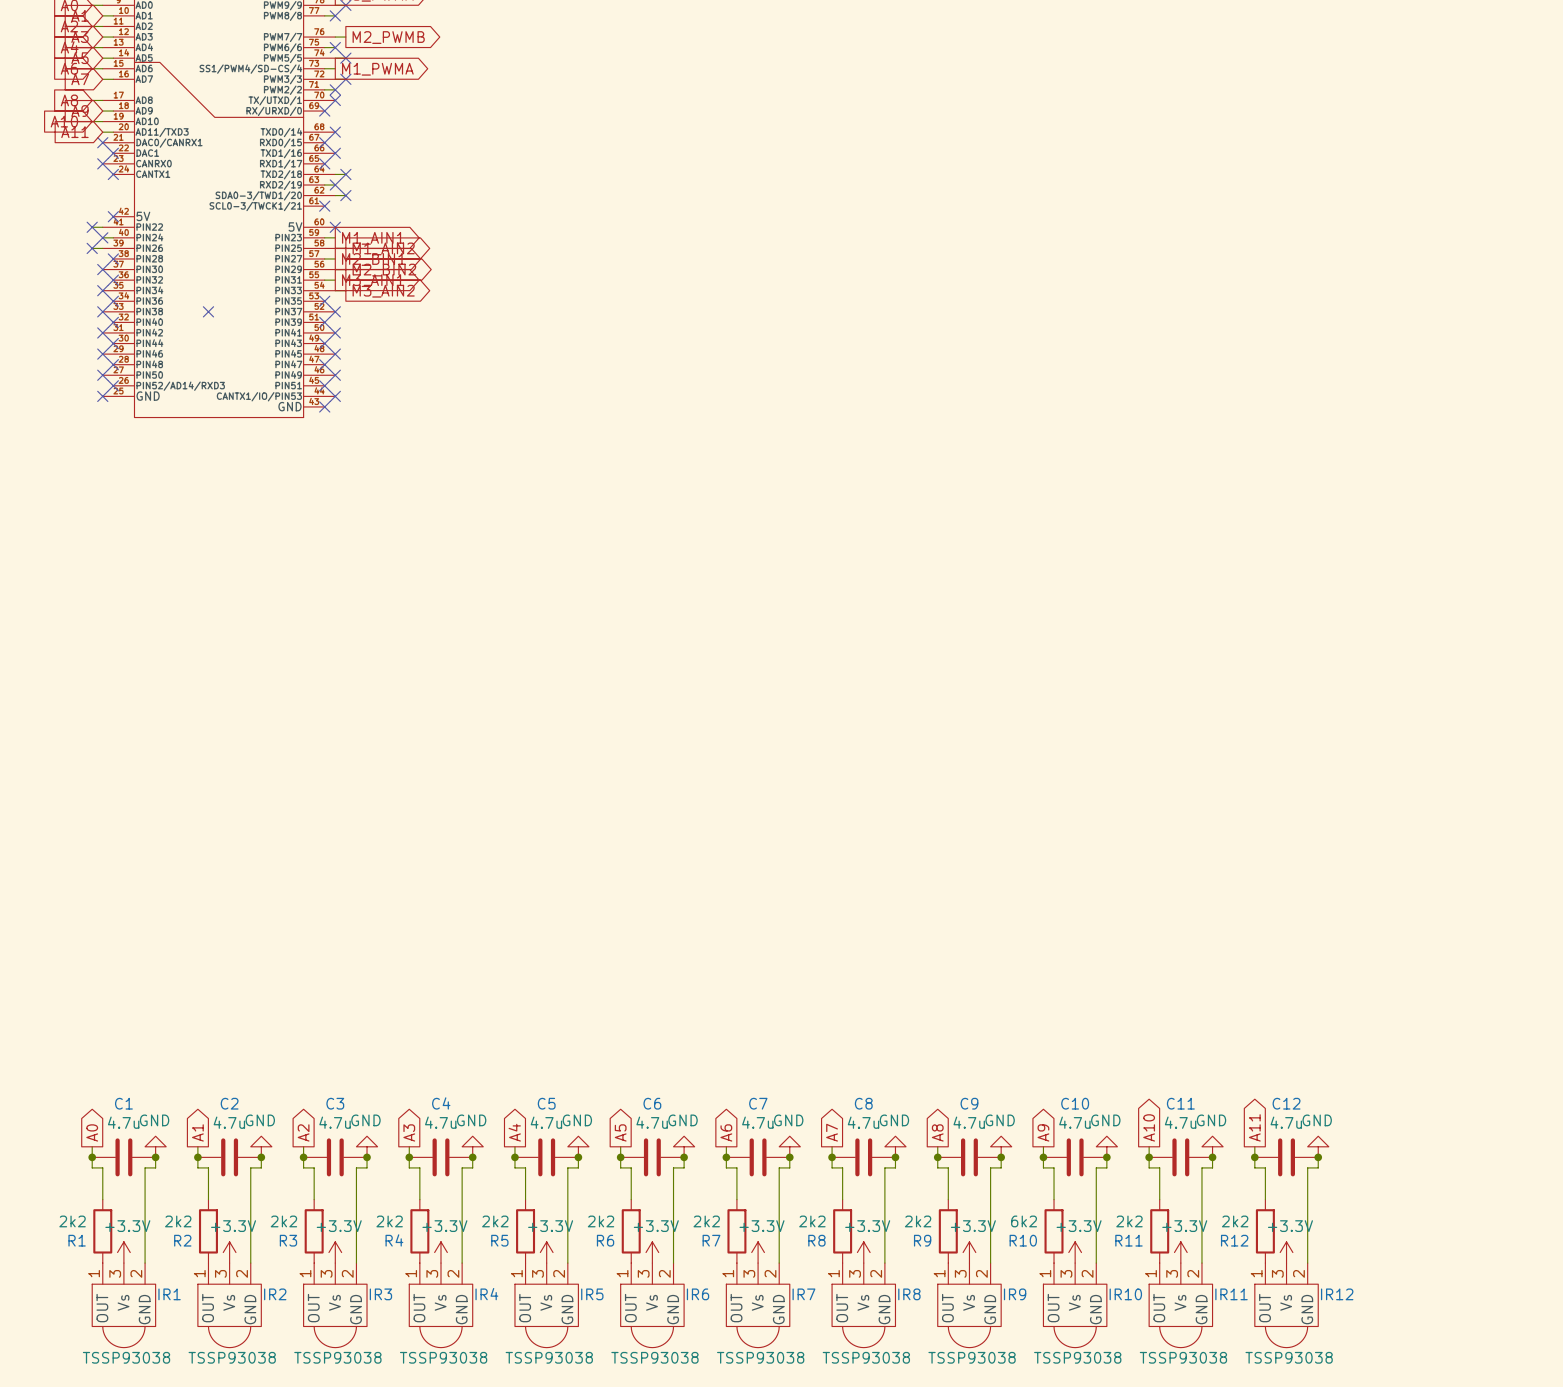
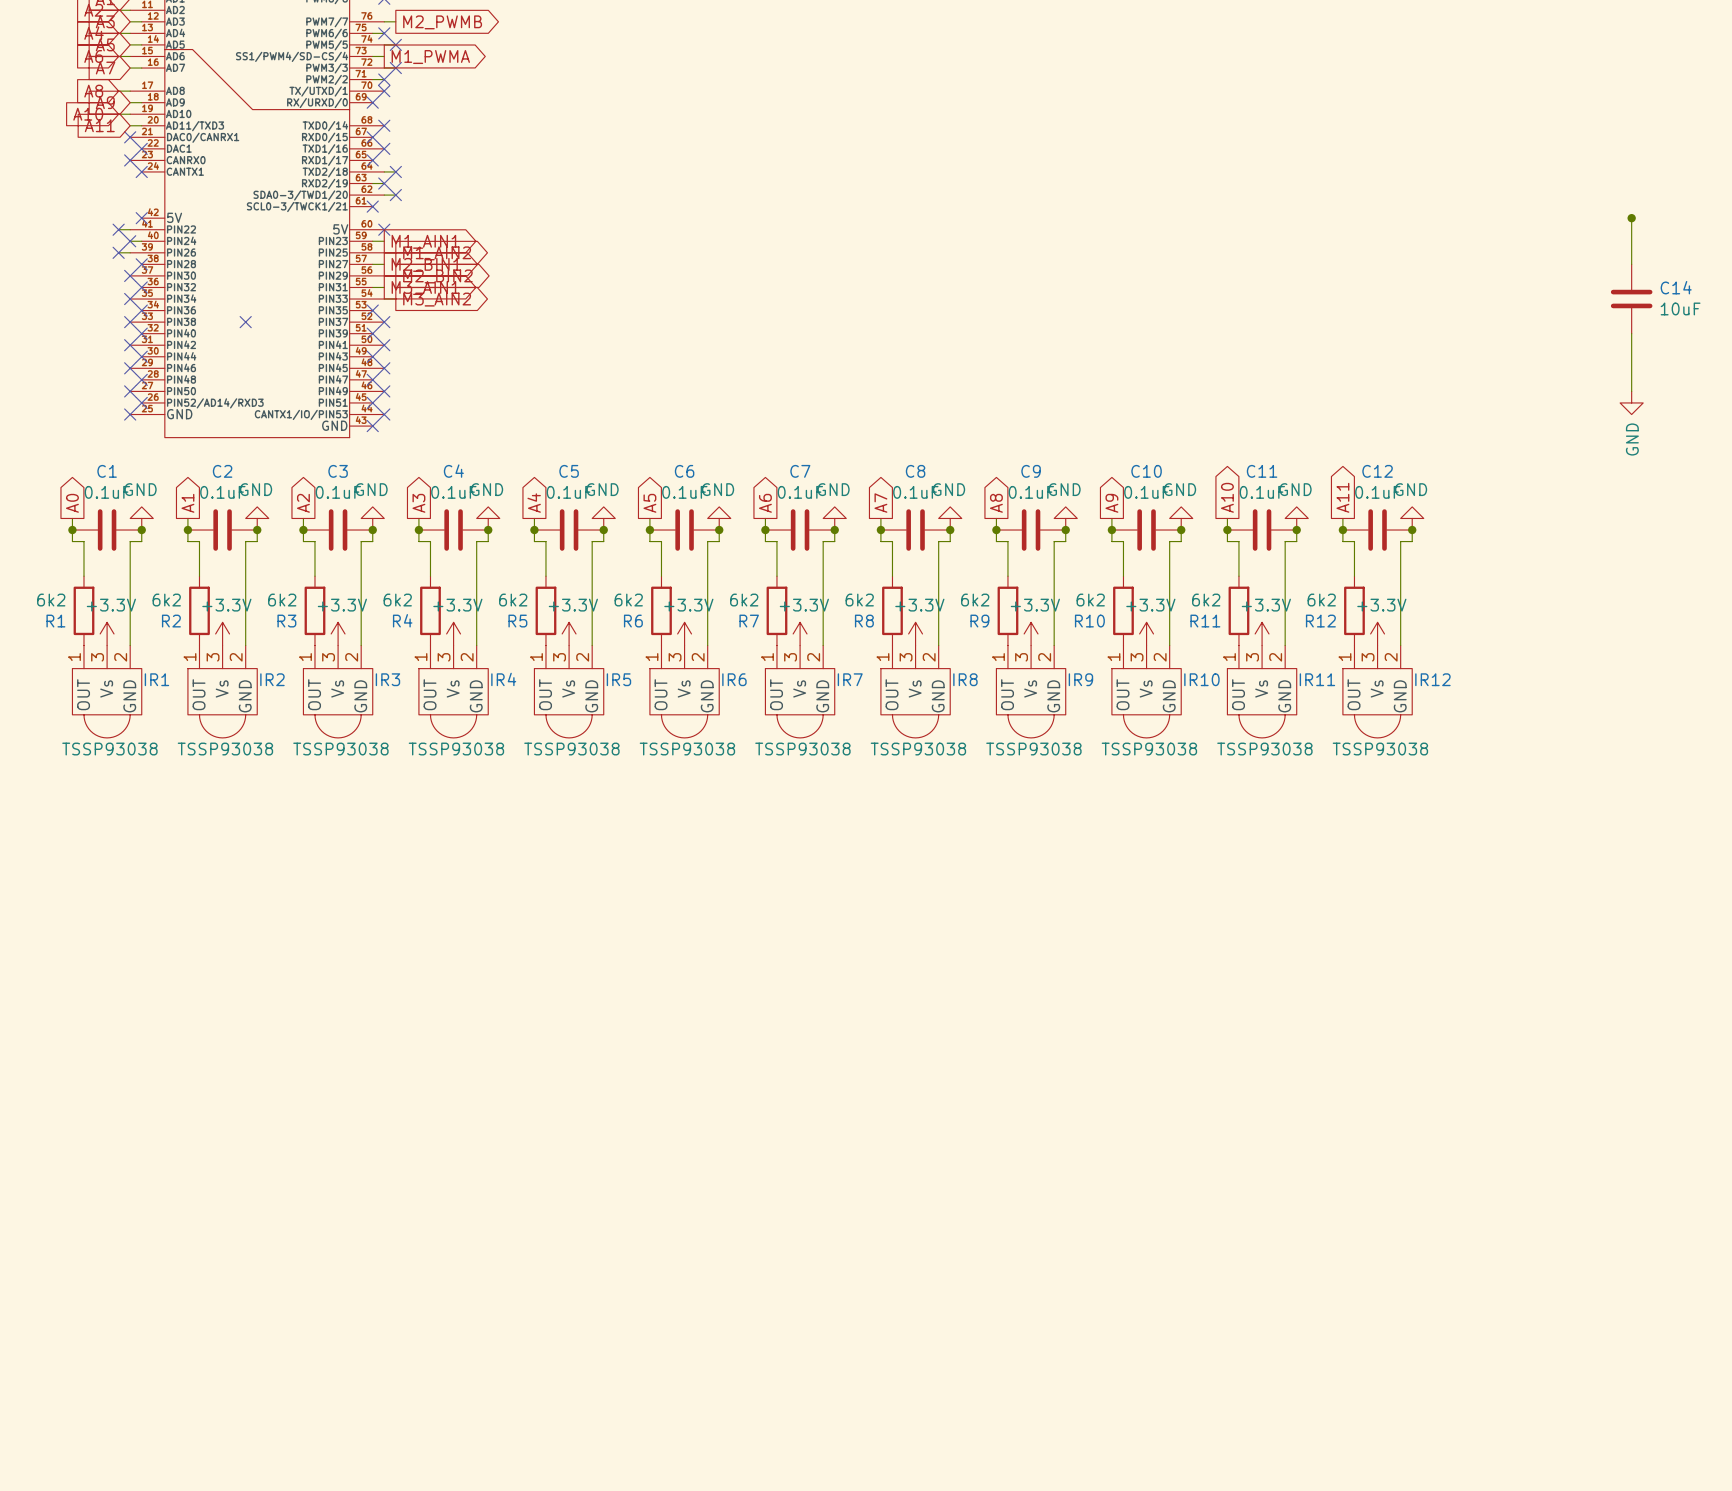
wire: none -> (1631, 218) (1631, 264)
junction: none -> (1631, 218)
C14: none -> 10uF (1631, 299)
wire: none -> (1631, 333) (1631, 391)
power symbol: none -> GND (1631, 402)
global label: none -> A10 (1227, 497)
global label: none -> A11 (1342, 497)
global label: none -> A0 (72, 503)
global label: none -> A1 (187, 503)
global label: none -> A2 (303, 503)
global label: none -> A3 (418, 503)
global label: none -> A4 (534, 503)
global label: none -> A5 (649, 503)
global label: none -> A6 (765, 503)
global label: none -> A7 (880, 503)
global label: none -> A8 (996, 503)
global label: none -> A9 (1111, 503)
wire: none -> (72, 518) (72, 541) (83, 541) (83, 576)
power symbol: none -> GND (141, 518)
wire: none -> (187, 518) (187, 541) (199, 541) (199, 576)
power symbol: none -> GND (257, 518)
wire: none -> (303, 518) (303, 541) (314, 541) (314, 576)
power symbol: none -> GND (372, 518)
wire: none -> (418, 518) (418, 541) (430, 541) (430, 576)
power symbol: none -> GND (488, 518)
wire: none -> (534, 518) (534, 541) (545, 541) (545, 576)
power symbol: none -> GND (603, 518)
wire: none -> (649, 518) (649, 541) (661, 541) (661, 576)
power symbol: none -> GND (719, 518)
wire: none -> (765, 518) (765, 541) (776, 541) (776, 576)
power symbol: none -> GND (834, 518)
wire: none -> (880, 518) (880, 541) (892, 541) (892, 576)
power symbol: none -> GND (950, 518)
wire: none -> (996, 518) (996, 541) (1007, 541) (1007, 576)
power symbol: none -> GND (1065, 518)
wire: none -> (1111, 518) (1111, 541) (1123, 541) (1123, 576)
power symbol: none -> GND (1181, 518)
wire: none -> (1227, 518) (1227, 541) (1238, 541) (1238, 576)
power symbol: none -> GND (1296, 518)
wire: none -> (1342, 518) (1342, 541) (1354, 541) (1354, 576)
power symbol: none -> GND (1412, 518)
junction: none -> (72, 530)
wire: none -> (141, 530) (141, 541) (130, 541) (130, 645)
junction: none -> (141, 530)
junction: none -> (187, 530)
wire: none -> (257, 530) (257, 541) (245, 541) (245, 645)
junction: none -> (257, 530)
junction: none -> (303, 530)
wire: none -> (372, 530) (372, 541) (361, 541) (361, 645)
junction: none -> (372, 530)
junction: none -> (418, 530)
wire: none -> (488, 530) (488, 541) (476, 541) (476, 645)
junction: none -> (488, 530)
junction: none -> (534, 530)
wire: none -> (603, 530) (603, 541) (592, 541) (592, 645)
junction: none -> (603, 530)
junction: none -> (649, 530)
wire: none -> (719, 530) (719, 541) (707, 541) (707, 645)
junction: none -> (719, 530)
junction: none -> (765, 530)
wire: none -> (834, 530) (834, 541) (823, 541) (823, 645)
junction: none -> (834, 530)
junction: none -> (880, 530)
wire: none -> (950, 530) (950, 541) (938, 541) (938, 645)
junction: none -> (950, 530)
junction: none -> (996, 530)
wire: none -> (1065, 530) (1065, 541) (1054, 541) (1054, 645)
junction: none -> (1065, 530)
junction: none -> (1111, 530)
wire: none -> (1181, 530) (1181, 541) (1169, 541) (1169, 645)
junction: none -> (1181, 530)
junction: none -> (1227, 530)
wire: none -> (1296, 530) (1296, 541) (1285, 541) (1285, 645)
junction: none -> (1296, 530)
junction: none -> (1342, 530)
wire: none -> (1412, 530) (1412, 541) (1400, 541) (1400, 645)
junction: none -> (1412, 530)
power symbol: none -> +3.3V (107, 633)
power symbol: none -> +3.3V (222, 633)
power symbol: none -> +3.3V (338, 633)
power symbol: none -> +3.3V (453, 633)
power symbol: none -> +3.3V (569, 633)
power symbol: none -> +3.3V (684, 633)
power symbol: none -> +3.3V (800, 633)
power symbol: none -> +3.3V (915, 633)
power symbol: none -> +3.3V (1031, 633)
power symbol: none -> +3.3V (1146, 633)
power symbol: none -> +3.3V (1262, 633)
power symbol: none -> +3.3V (1377, 633)
C1 value: 4.7u (123, 1122) -> 0.1uF (107, 492)
C2 value: 4.7u (229, 1122) -> 0.1uF (222, 492)
C3 value: 4.7u (335, 1122) -> 0.1uF (338, 492)
C4 value: 4.7u (440, 1122) -> 0.1uF (453, 492)
C5 value: 4.7u (546, 1122) -> 0.1uF (569, 492)
C6 value: 4.7u (652, 1122) -> 0.1uF (684, 492)
C7 value: 4.7u (757, 1122) -> 0.1uF (800, 492)
C8 value: 4.7u (863, 1122) -> 0.1uF (915, 492)
C9 value: 4.7u (969, 1122) -> 0.1uF (1031, 492)
C10 value: 4.7u (1074, 1122) -> 0.1uF (1146, 492)
C11 value: 4.7u (1180, 1122) -> 0.1uF (1262, 492)
C12 value: 4.7u (1286, 1122) -> 0.1uF (1377, 492)
global label: A10 (1149, 1127) -> none
global label: A11 (1254, 1127) -> none
global label: A0 (92, 1132) -> none
global label: A1 (197, 1132) -> none
global label: A2 (303, 1132) -> none
global label: A3 (409, 1132) -> none
global label: A4 (514, 1132) -> none
global label: A5 (620, 1132) -> none
global label: A6 (726, 1132) -> none
global label: A7 (832, 1132) -> none
global label: A8 (937, 1132) -> none
global label: A9 (1043, 1132) -> none
wire: (92, 1146) (92, 1167) (102, 1167) (102, 1199) -> none
power symbol: GND (155, 1146) -> none
wire: (197, 1146) (197, 1167) (208, 1167) (208, 1199) -> none
power symbol: GND (261, 1146) -> none
wire: (303, 1146) (303, 1167) (314, 1167) (314, 1199) -> none
power symbol: GND (367, 1146) -> none
wire: (409, 1146) (409, 1167) (419, 1167) (419, 1199) -> none
power symbol: GND (472, 1146) -> none
wire: (514, 1146) (514, 1167) (525, 1167) (525, 1199) -> none
power symbol: GND (578, 1146) -> none
wire: (620, 1146) (620, 1167) (631, 1167) (631, 1199) -> none
power symbol: GND (684, 1146) -> none
wire: (726, 1146) (726, 1167) (736, 1167) (736, 1199) -> none
power symbol: GND (789, 1146) -> none
wire: (832, 1146) (832, 1167) (842, 1167) (842, 1199) -> none
power symbol: GND (895, 1146) -> none
wire: (937, 1146) (937, 1167) (948, 1167) (948, 1199) -> none
power symbol: GND (1001, 1146) -> none
wire: (1043, 1146) (1043, 1167) (1054, 1167) (1054, 1199) -> none
power symbol: GND (1106, 1146) -> none
wire: (1149, 1146) (1149, 1167) (1159, 1167) (1159, 1199) -> none
power symbol: GND (1212, 1146) -> none
wire: (1254, 1146) (1254, 1167) (1265, 1167) (1265, 1199) -> none
power symbol: GND (1318, 1146) -> none
junction: (92, 1157) -> none
C1 position: (123, 1157) -> (107, 530)
wire: (155, 1157) (155, 1167) (145, 1167) (145, 1263) -> none
junction: (155, 1157) -> none
junction: (197, 1157) -> none
C2 position: (229, 1157) -> (222, 530)
wire: (261, 1157) (261, 1167) (250, 1167) (250, 1263) -> none
junction: (261, 1157) -> none
junction: (303, 1157) -> none
C3 position: (335, 1157) -> (338, 530)
wire: (367, 1157) (367, 1167) (356, 1167) (356, 1263) -> none
junction: (367, 1157) -> none
junction: (409, 1157) -> none
C4 position: (440, 1157) -> (453, 530)
wire: (472, 1157) (472, 1167) (462, 1167) (462, 1263) -> none
junction: (472, 1157) -> none
junction: (514, 1157) -> none
C5 position: (546, 1157) -> (569, 530)
wire: (578, 1157) (578, 1167) (567, 1167) (567, 1263) -> none
junction: (578, 1157) -> none
junction: (620, 1157) -> none
C6 position: (652, 1157) -> (684, 530)
wire: (684, 1157) (684, 1167) (673, 1167) (673, 1263) -> none
junction: (684, 1157) -> none
junction: (726, 1157) -> none
C7 position: (758, 1157) -> (800, 530)
wire: (789, 1157) (789, 1167) (779, 1167) (779, 1263) -> none
junction: (789, 1157) -> none
junction: (832, 1157) -> none
C8 position: (863, 1157) -> (915, 530)
wire: (895, 1157) (895, 1167) (884, 1167) (884, 1263) -> none
junction: (895, 1157) -> none
junction: (937, 1157) -> none
C9 position: (969, 1157) -> (1031, 530)
wire: (1001, 1157) (1001, 1167) (990, 1167) (990, 1263) -> none
junction: (1001, 1157) -> none
junction: (1043, 1157) -> none
C10 position: (1075, 1157) -> (1146, 530)
wire: (1106, 1157) (1106, 1167) (1096, 1167) (1096, 1263) -> none
junction: (1106, 1157) -> none
junction: (1149, 1157) -> none
C11 position: (1180, 1157) -> (1262, 530)
wire: (1212, 1157) (1212, 1167) (1201, 1167) (1201, 1263) -> none
junction: (1212, 1157) -> none
junction: (1254, 1157) -> none
C12 position: (1286, 1157) -> (1377, 530)
wire: (1318, 1157) (1318, 1167) (1307, 1167) (1307, 1263) -> none
junction: (1318, 1157) -> none
R1 value: 2k2 (72, 1221) -> 6k2 (51, 600)
R2 value: 2k2 (178, 1221) -> 6k2 (166, 600)
R3 value: 2k2 (283, 1221) -> 6k2 (282, 600)
R4 value: 2k2 (389, 1221) -> 6k2 (397, 600)
R5 value: 2k2 (495, 1221) -> 6k2 (513, 600)
R6 value: 2k2 (601, 1221) -> 6k2 (628, 600)
R7 value: 2k2 (706, 1221) -> 6k2 (744, 600)
R8 value: 2k2 (812, 1221) -> 6k2 (859, 600)
R9 value: 2k2 (918, 1221) -> 6k2 (975, 600)
R11 value: 2k2 (1129, 1221) -> 6k2 (1206, 600)
R12 value: 2k2 (1235, 1221) -> 6k2 (1321, 600)
R1 position: (102, 1231) -> (83, 610)
R2 position: (208, 1231) -> (199, 610)
R3 position: (314, 1231) -> (314, 610)
R4 position: (419, 1231) -> (430, 610)
R5 position: (525, 1231) -> (545, 610)
R6 position: (631, 1231) -> (661, 610)
R7 position: (736, 1231) -> (776, 610)
R8 position: (842, 1231) -> (892, 610)
R9 position: (948, 1231) -> (1007, 610)
R10 position: (1054, 1231) -> (1123, 610)
R11 position: (1159, 1231) -> (1238, 610)
R12 position: (1265, 1231) -> (1354, 610)
power symbol: +3.3V (123, 1252) -> none
power symbol: +3.3V (229, 1252) -> none
power symbol: +3.3V (335, 1252) -> none
power symbol: +3.3V (440, 1252) -> none
power symbol: +3.3V (546, 1252) -> none
power symbol: +3.3V (652, 1252) -> none
power symbol: +3.3V (758, 1252) -> none
power symbol: +3.3V (863, 1252) -> none
power symbol: +3.3V (969, 1252) -> none
power symbol: +3.3V (1075, 1252) -> none
power symbol: +3.3V (1180, 1252) -> none
power symbol: +3.3V (1286, 1252) -> none
IR1 position: (123, 1305) -> (107, 691)
IR2 position: (229, 1305) -> (222, 691)
IR3 position: (335, 1305) -> (338, 691)
IR4 position: (440, 1305) -> (453, 691)
IR5 position: (546, 1305) -> (569, 691)
IR6 position: (652, 1305) -> (684, 691)
IR7 position: (758, 1305) -> (800, 691)
IR8 position: (863, 1305) -> (915, 691)
IR9 position: (969, 1305) -> (1031, 691)
IR10 position: (1075, 1305) -> (1146, 691)
IR11 position: (1180, 1305) -> (1262, 691)
IR12 position: (1286, 1305) -> (1377, 691)

